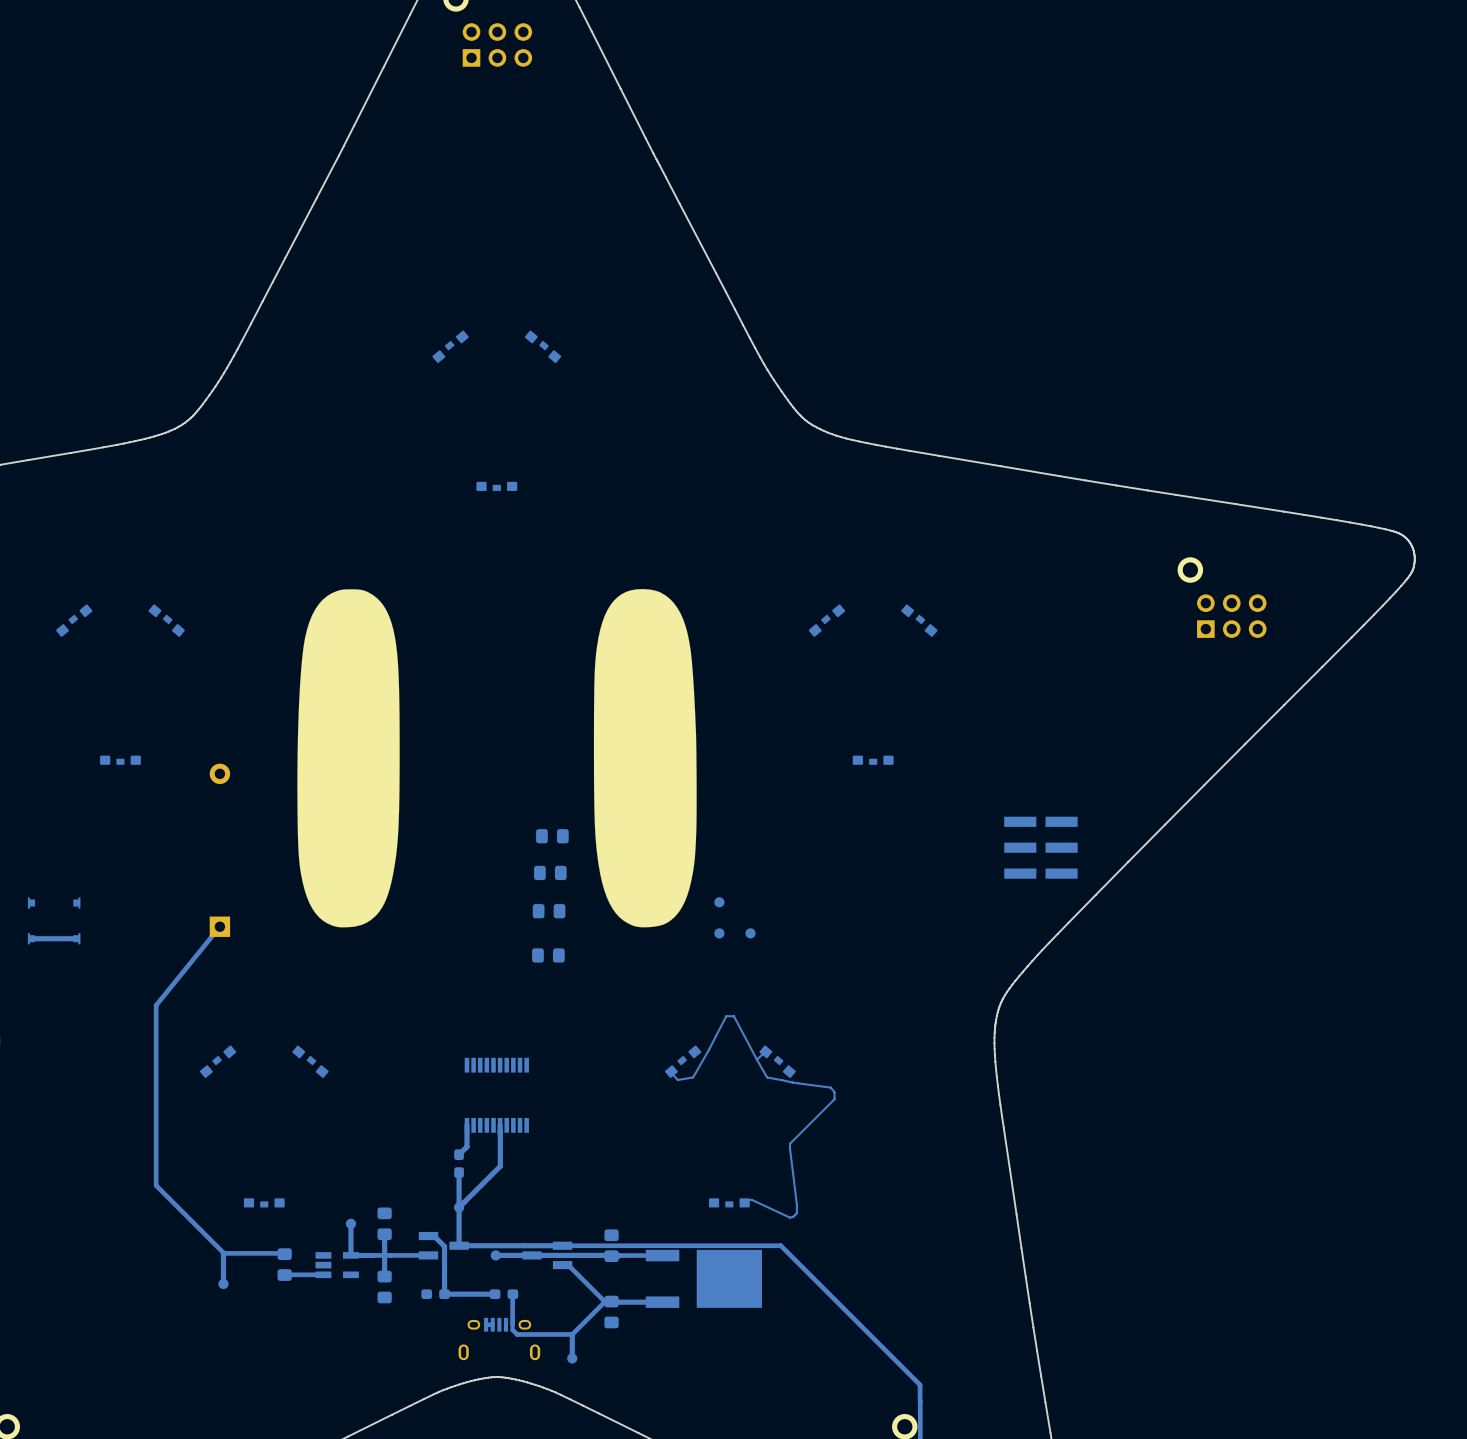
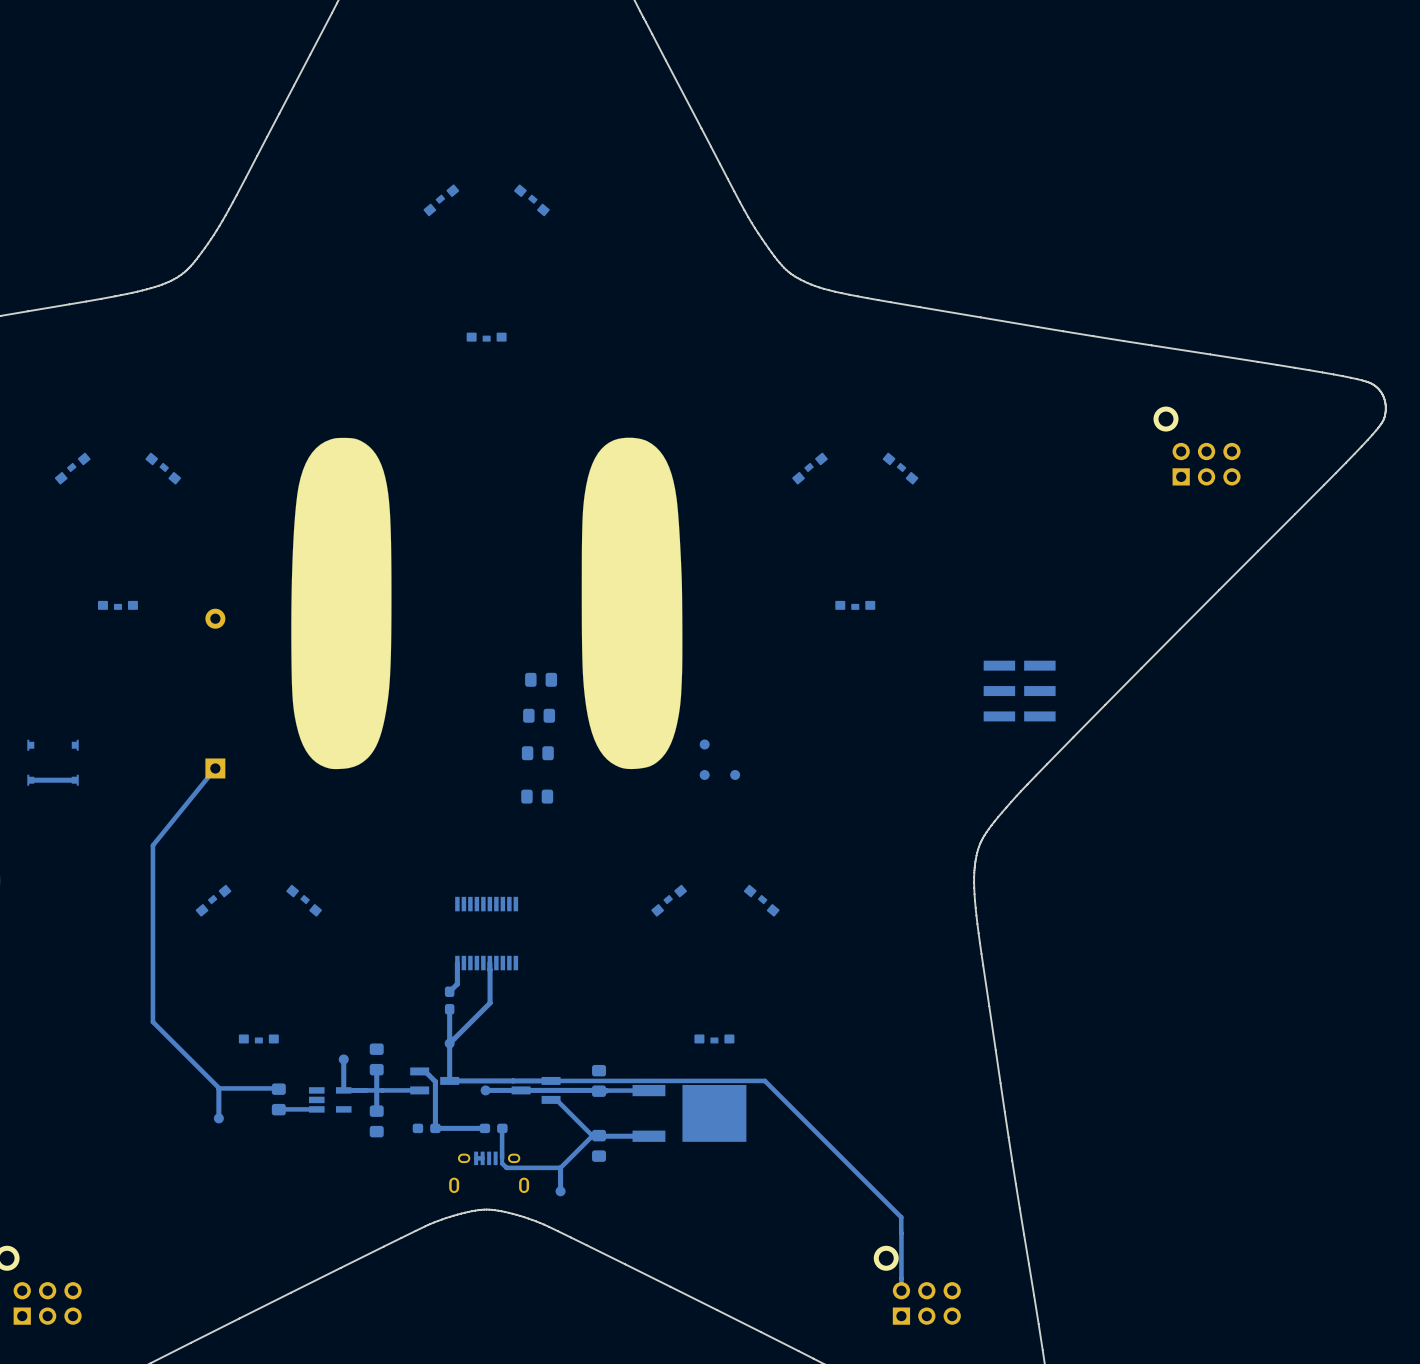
bottom track: (763, 1053) (756, 1059) -> none
bottom track: (756, 1059) (733, 1016) (726, 1016) (693, 1077) (677, 1079) (671, 1073) -> none
bottom track: (756, 1059) (767, 1077) (830, 1087) (834, 1092) (834, 1099) (790, 1143) (796, 1213) (790, 1217) (751, 1199) (744, 1202) -> none

